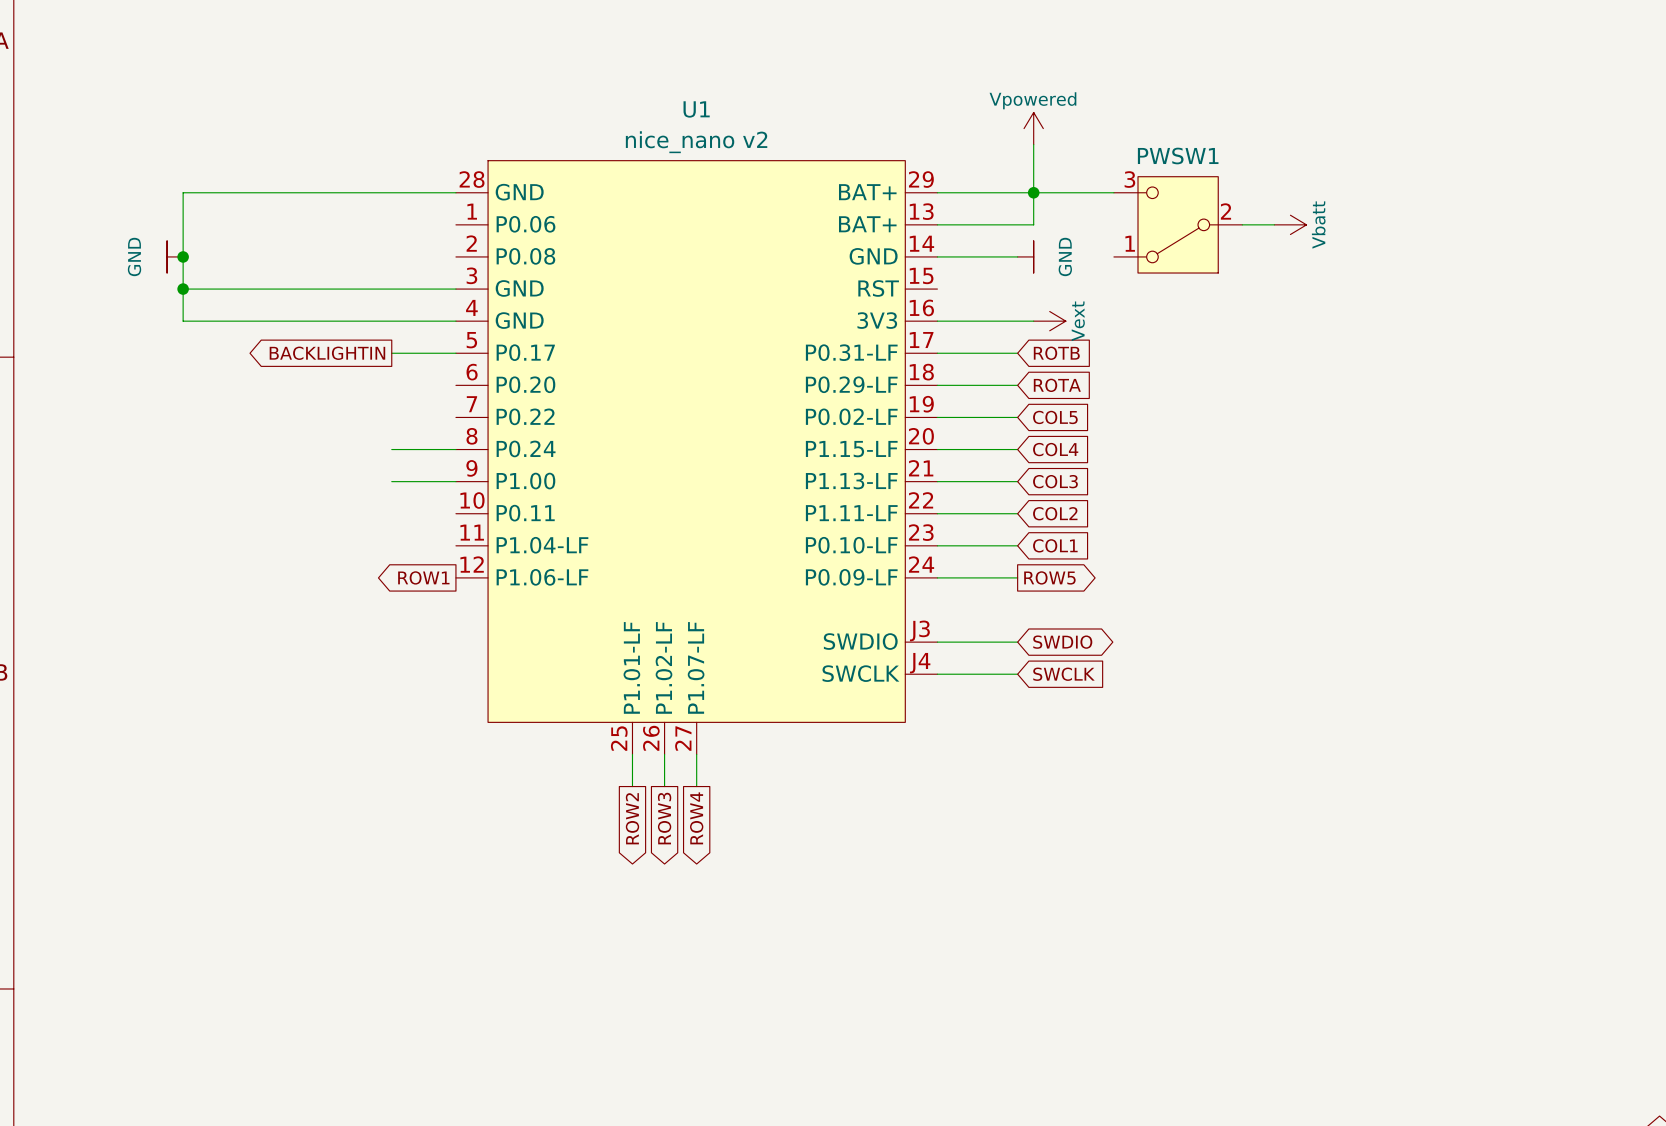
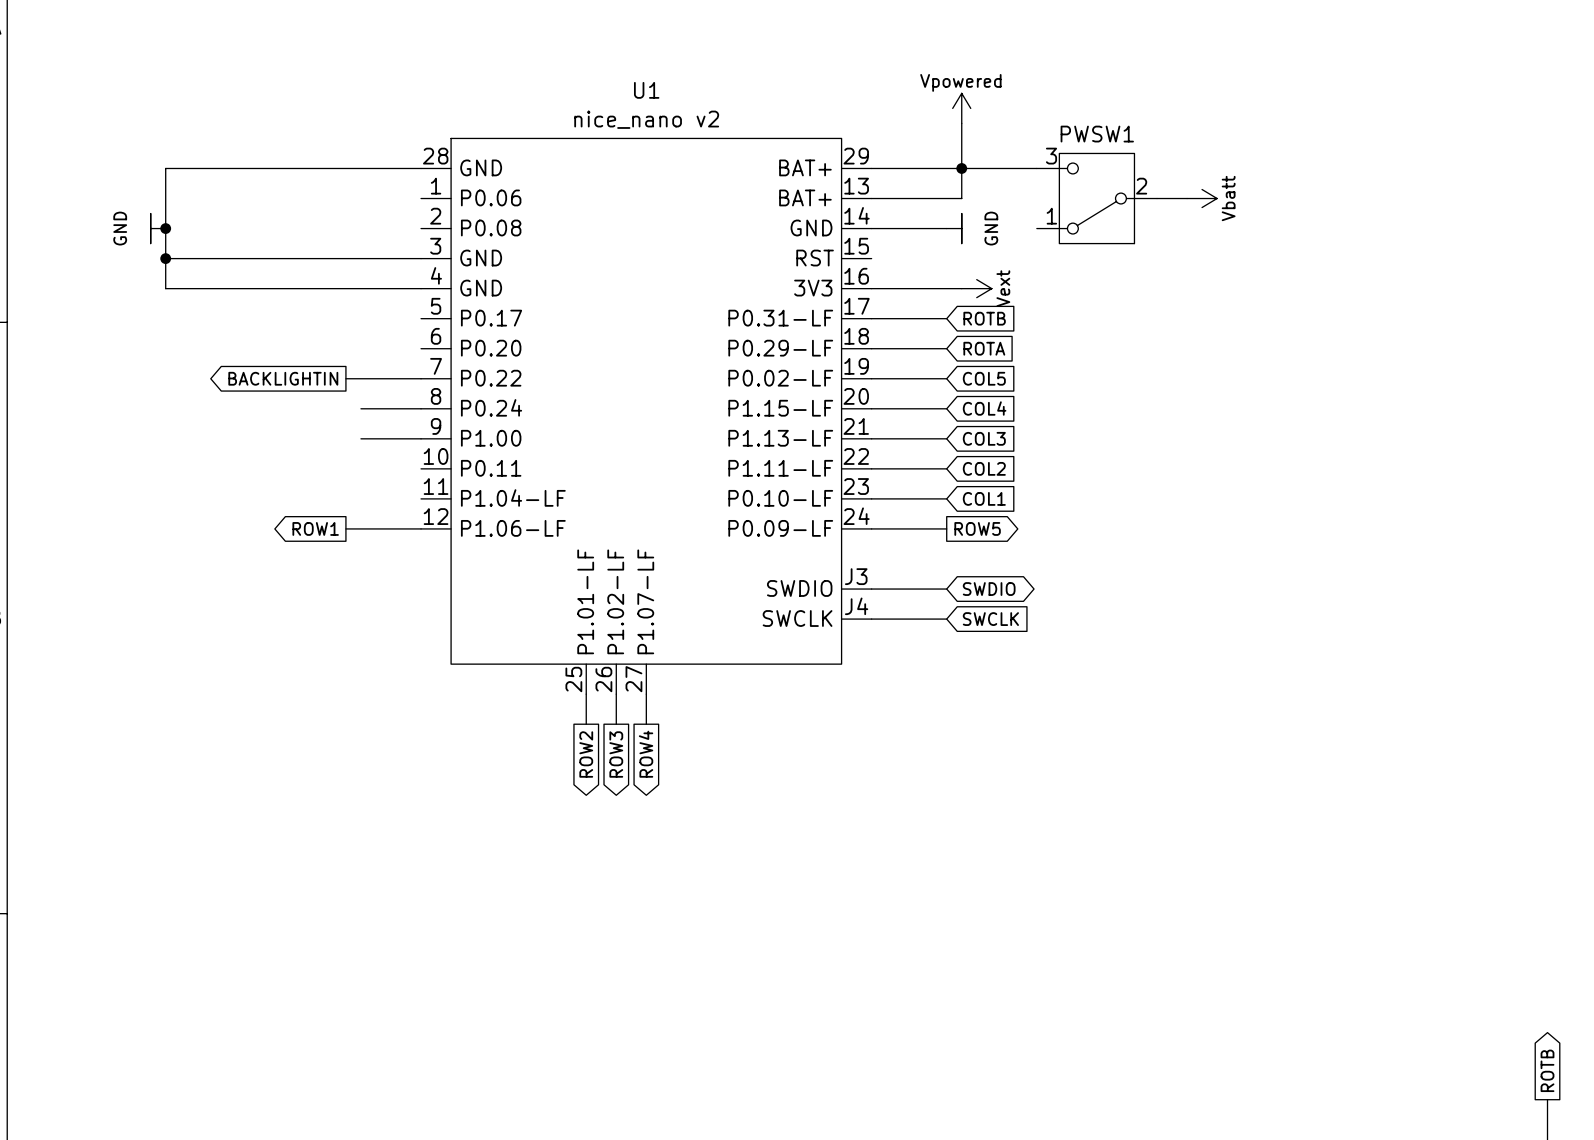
global label position: BACKLIGHTIN (327, 353) -> BACKLIGHTIN (283, 378)
wire: (391, 353) (455, 353) -> none
wire: none -> (345, 378) (421, 378)
wire: none -> (345, 528) (421, 528)
global label position: ROW1 (423, 577) -> ROW1 (315, 528)

